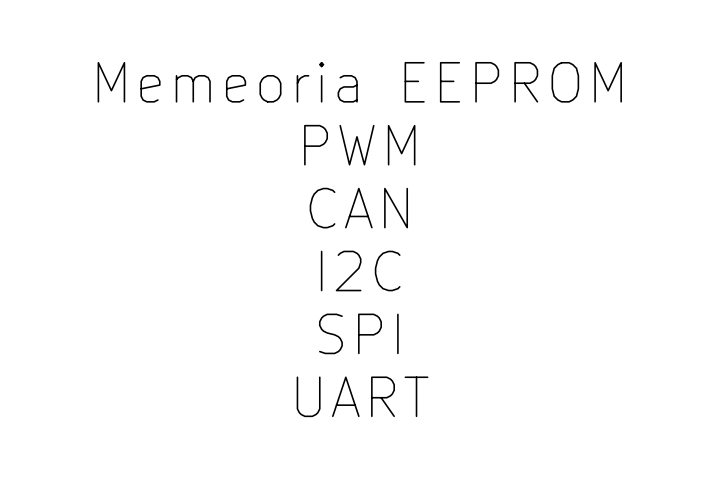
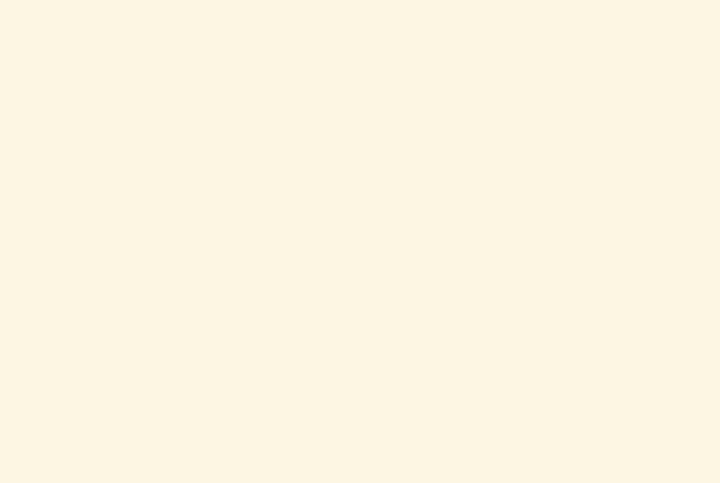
text: Memeoria EEPROM (359, 82) -> none
text: PWM (359, 145) -> none
text: CAN (358, 208) -> none
text: I2C (360, 270) -> none
text: SPI (358, 333) -> none
text: UART (362, 396) -> none

